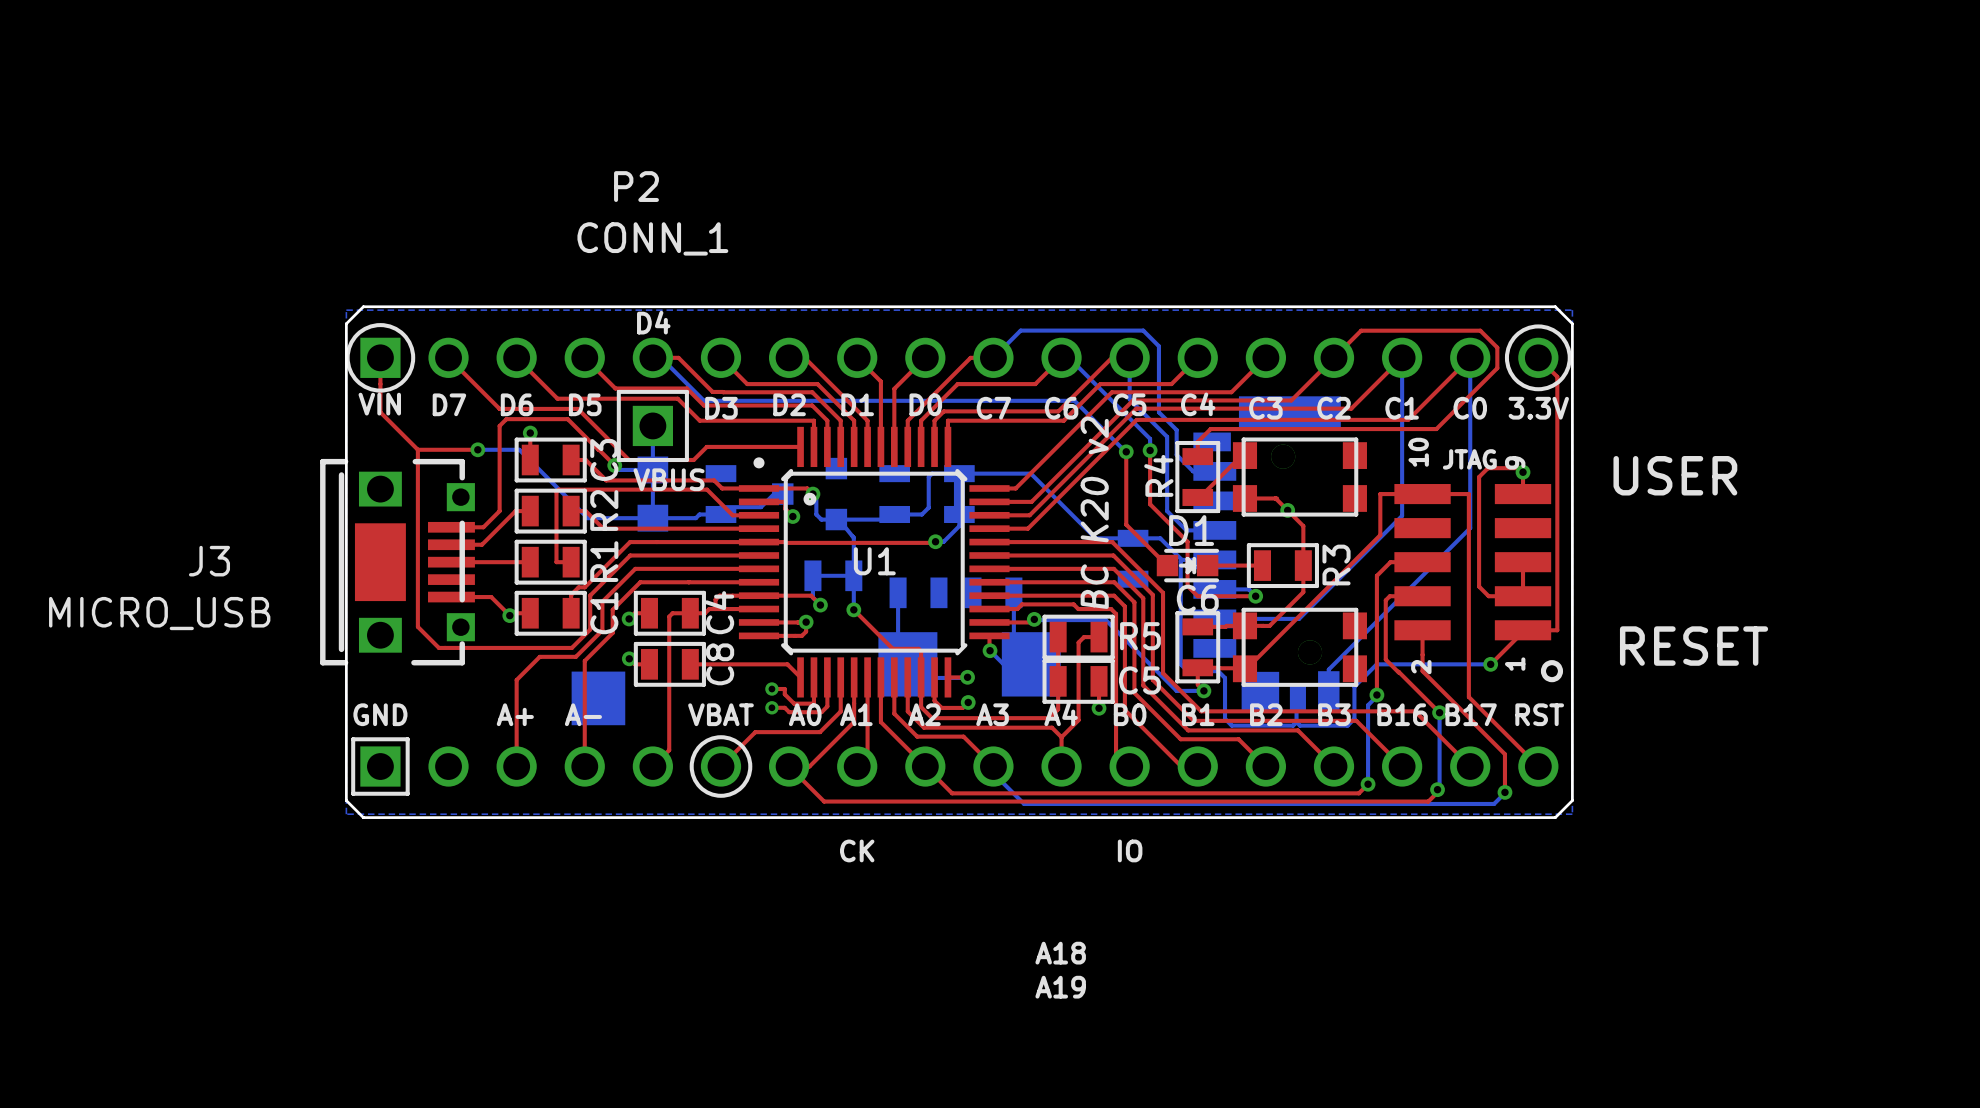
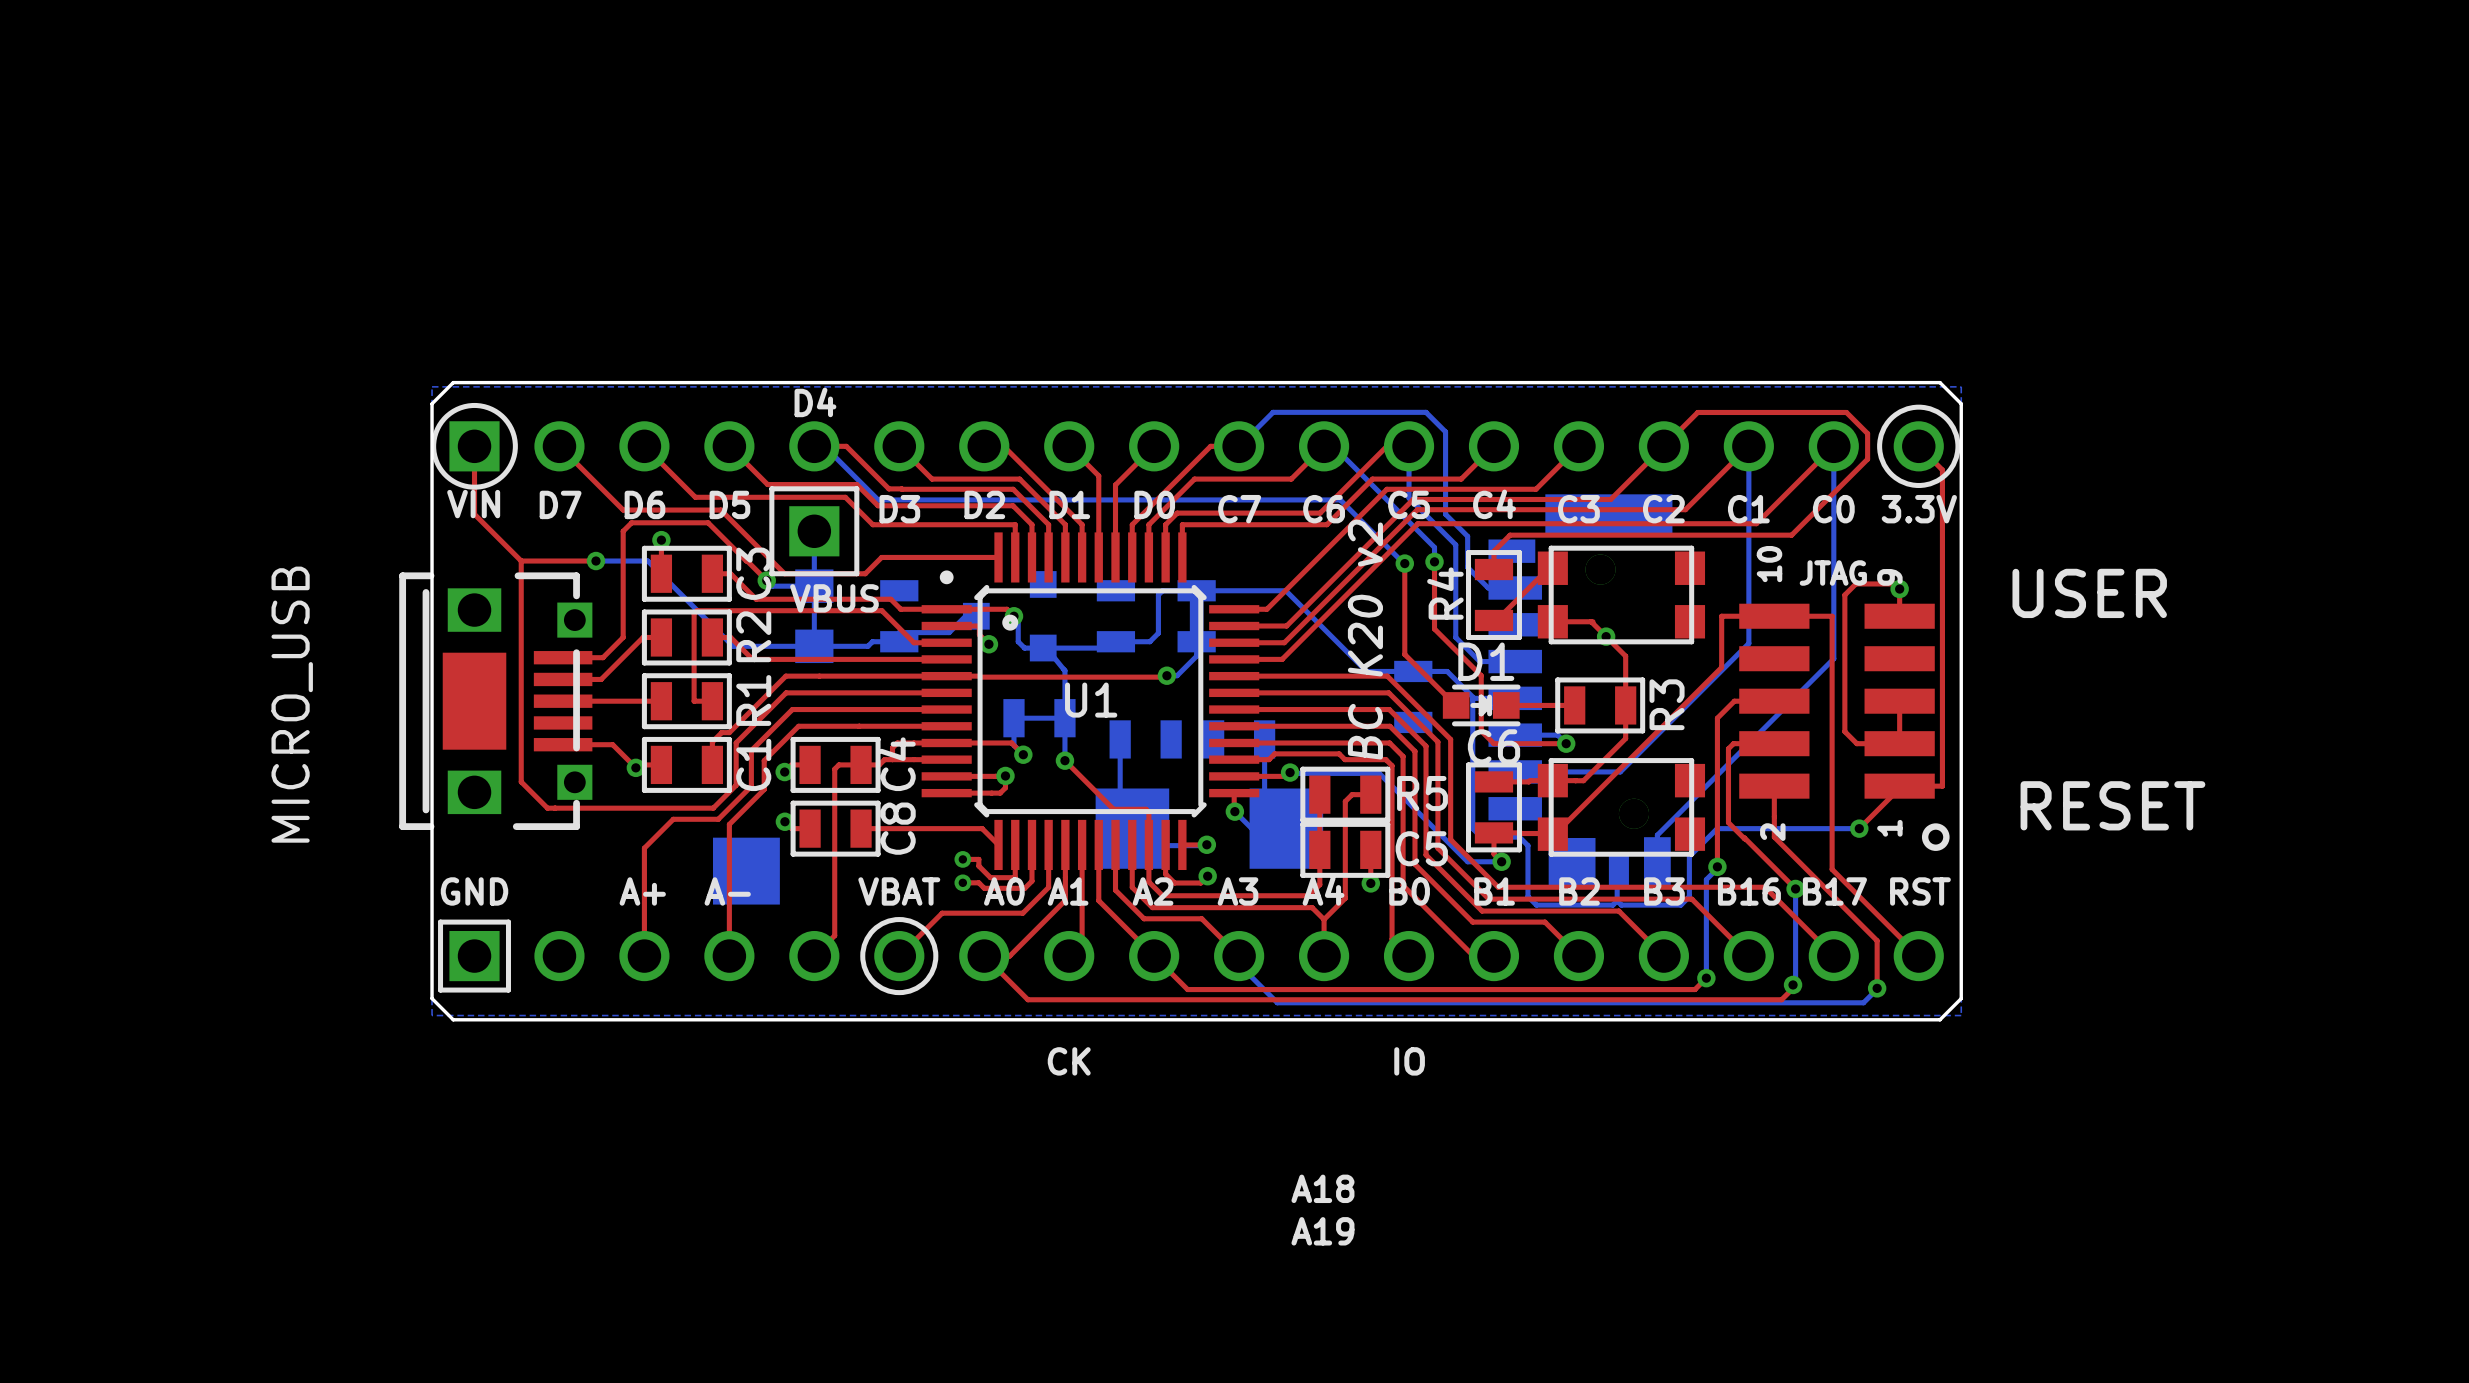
P2 name: P2 (636, 186) -> none
P2 value: CONN_1 (652, 238) -> none
J3 name: J3 (209, 561) -> none
J3 value rotation: 0° (159, 613) -> 90° counterclockwise (292, 704)

